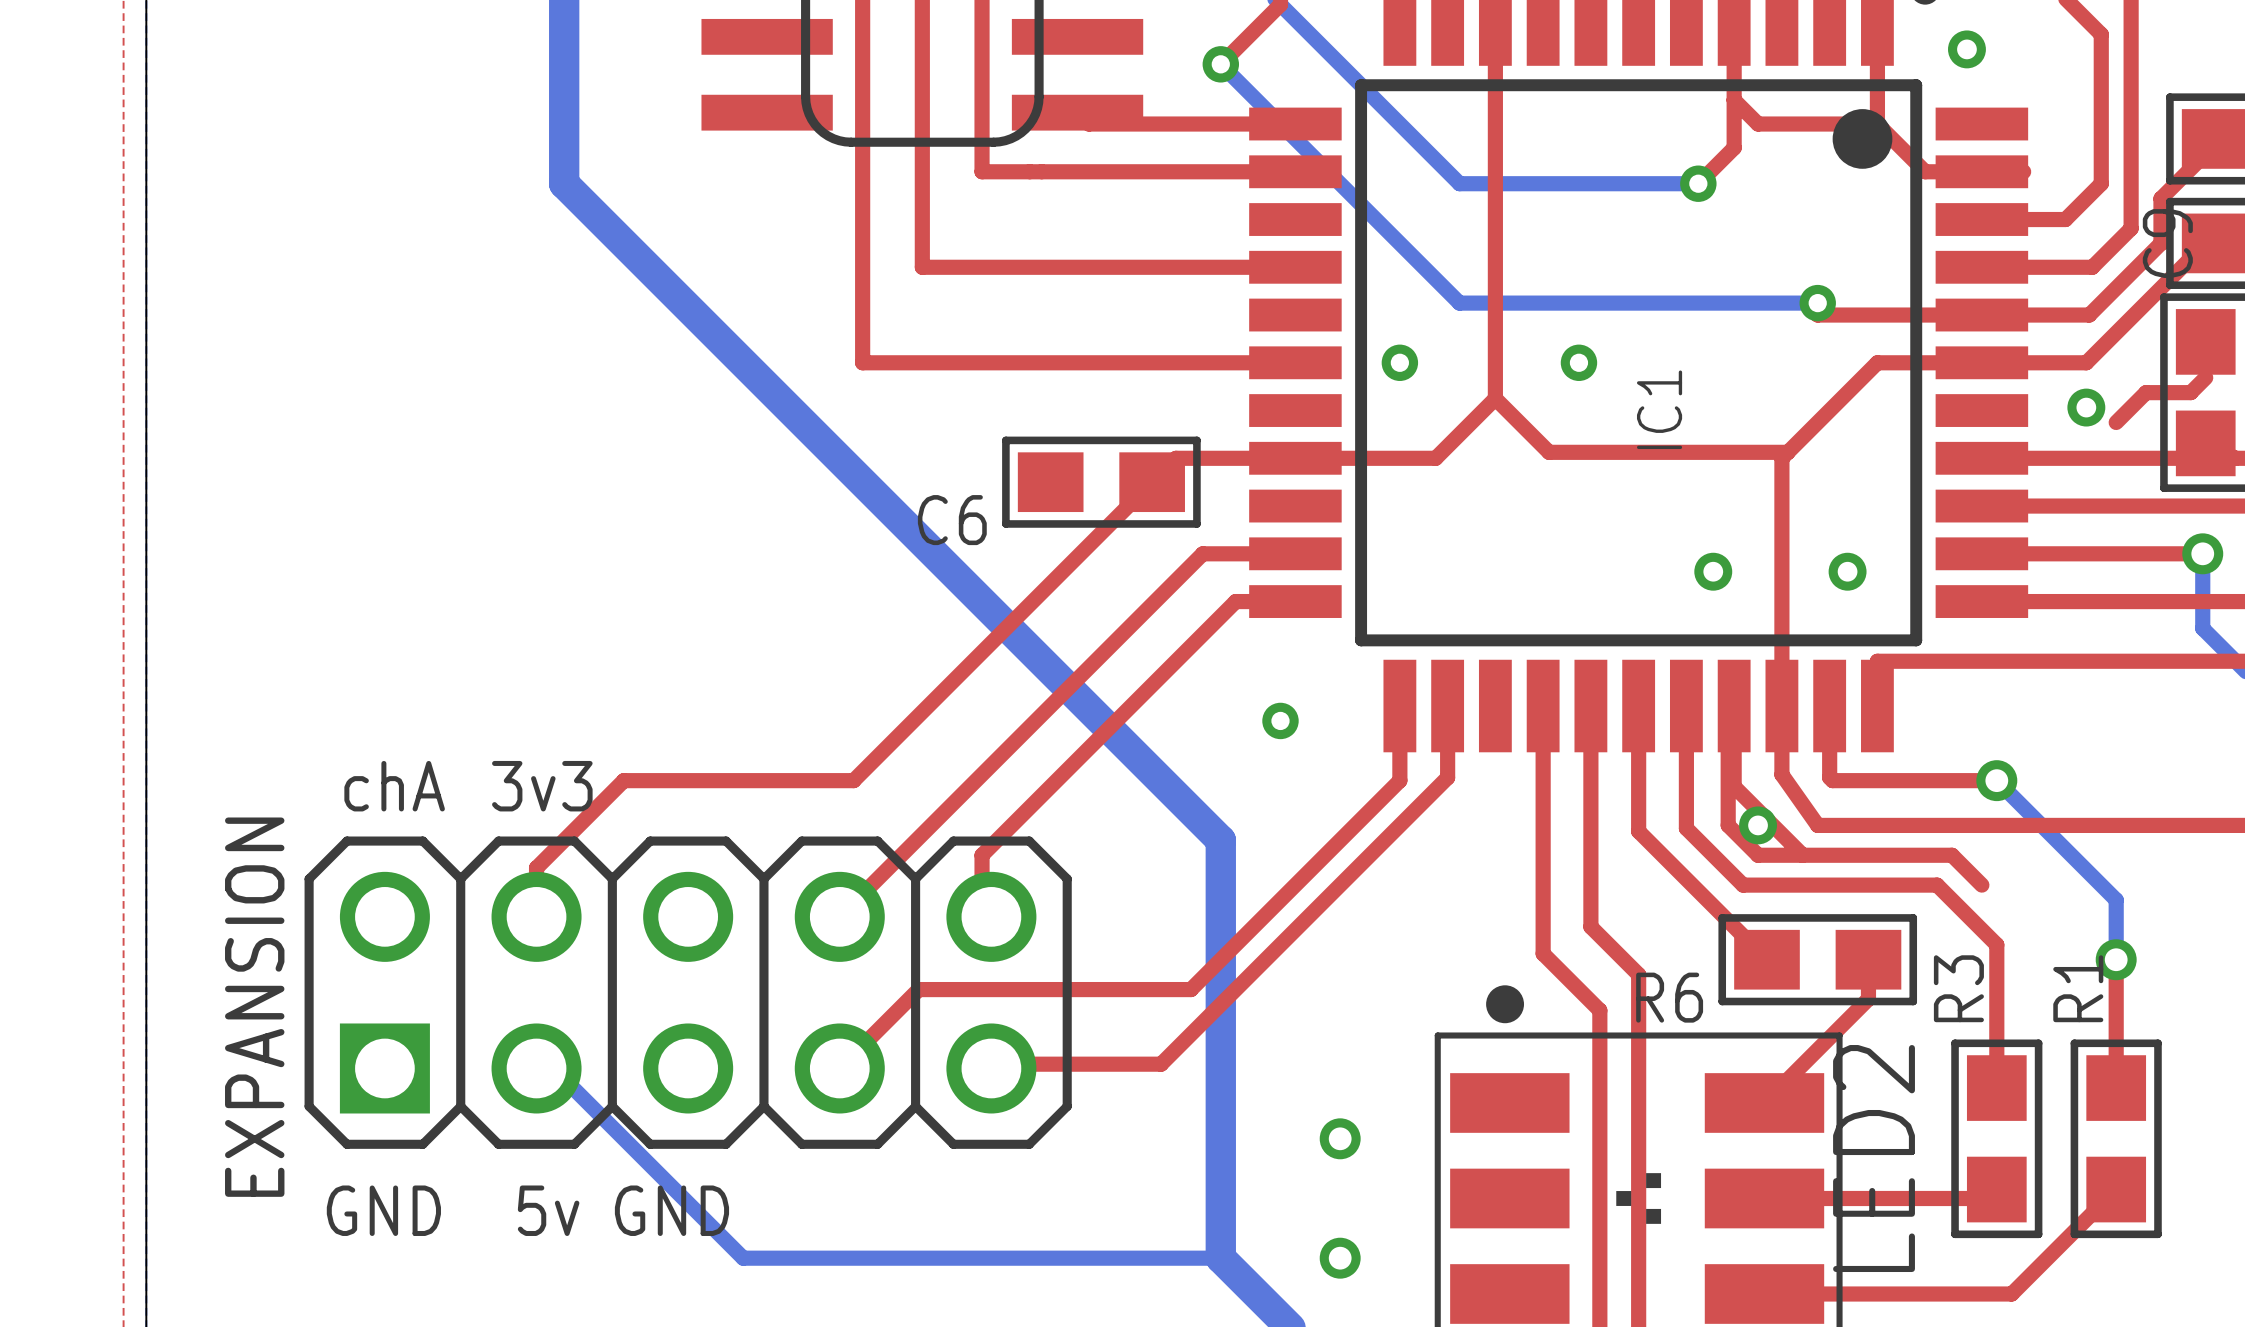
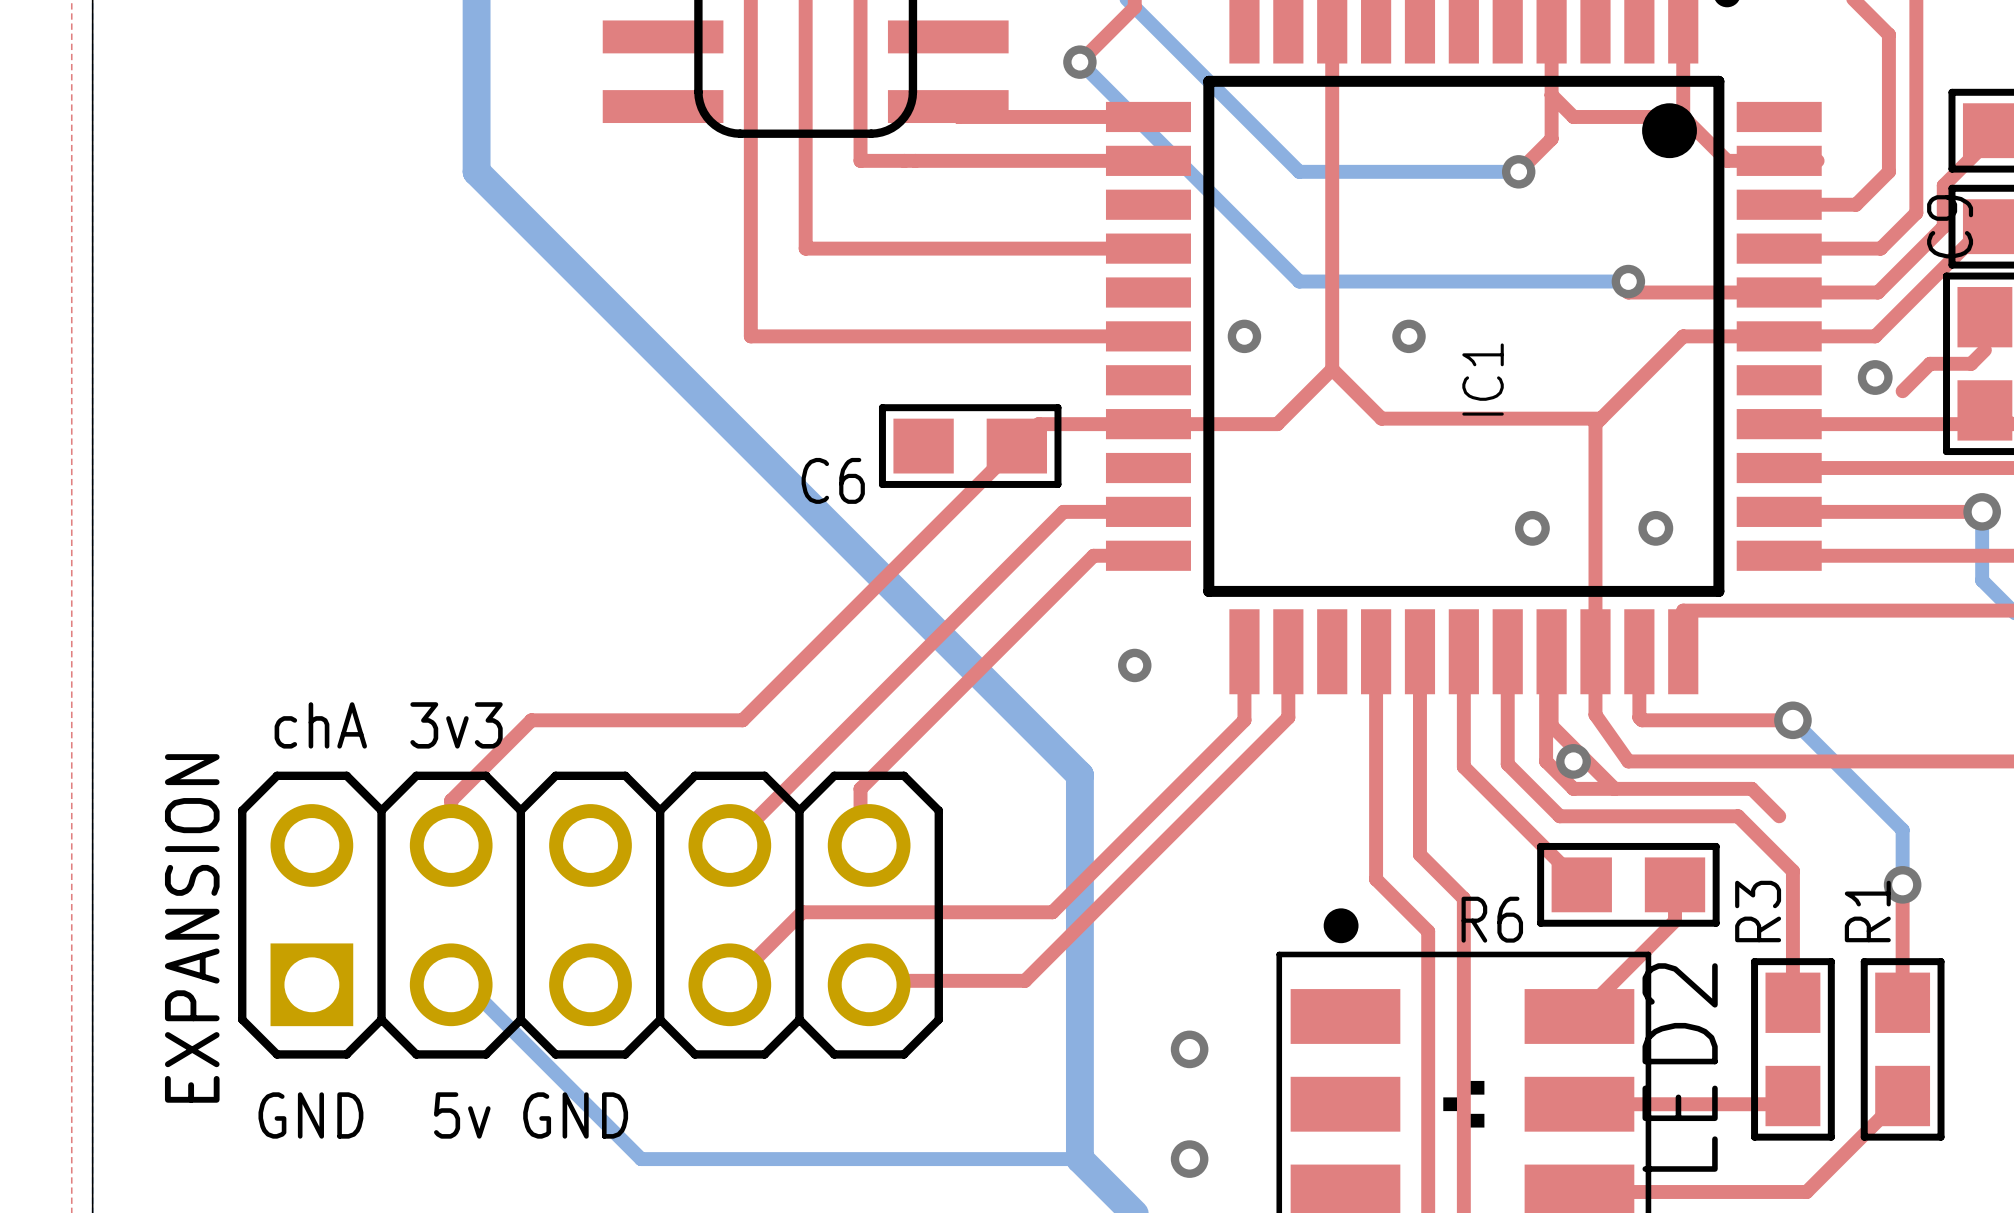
via: (1966, 49) -> none

